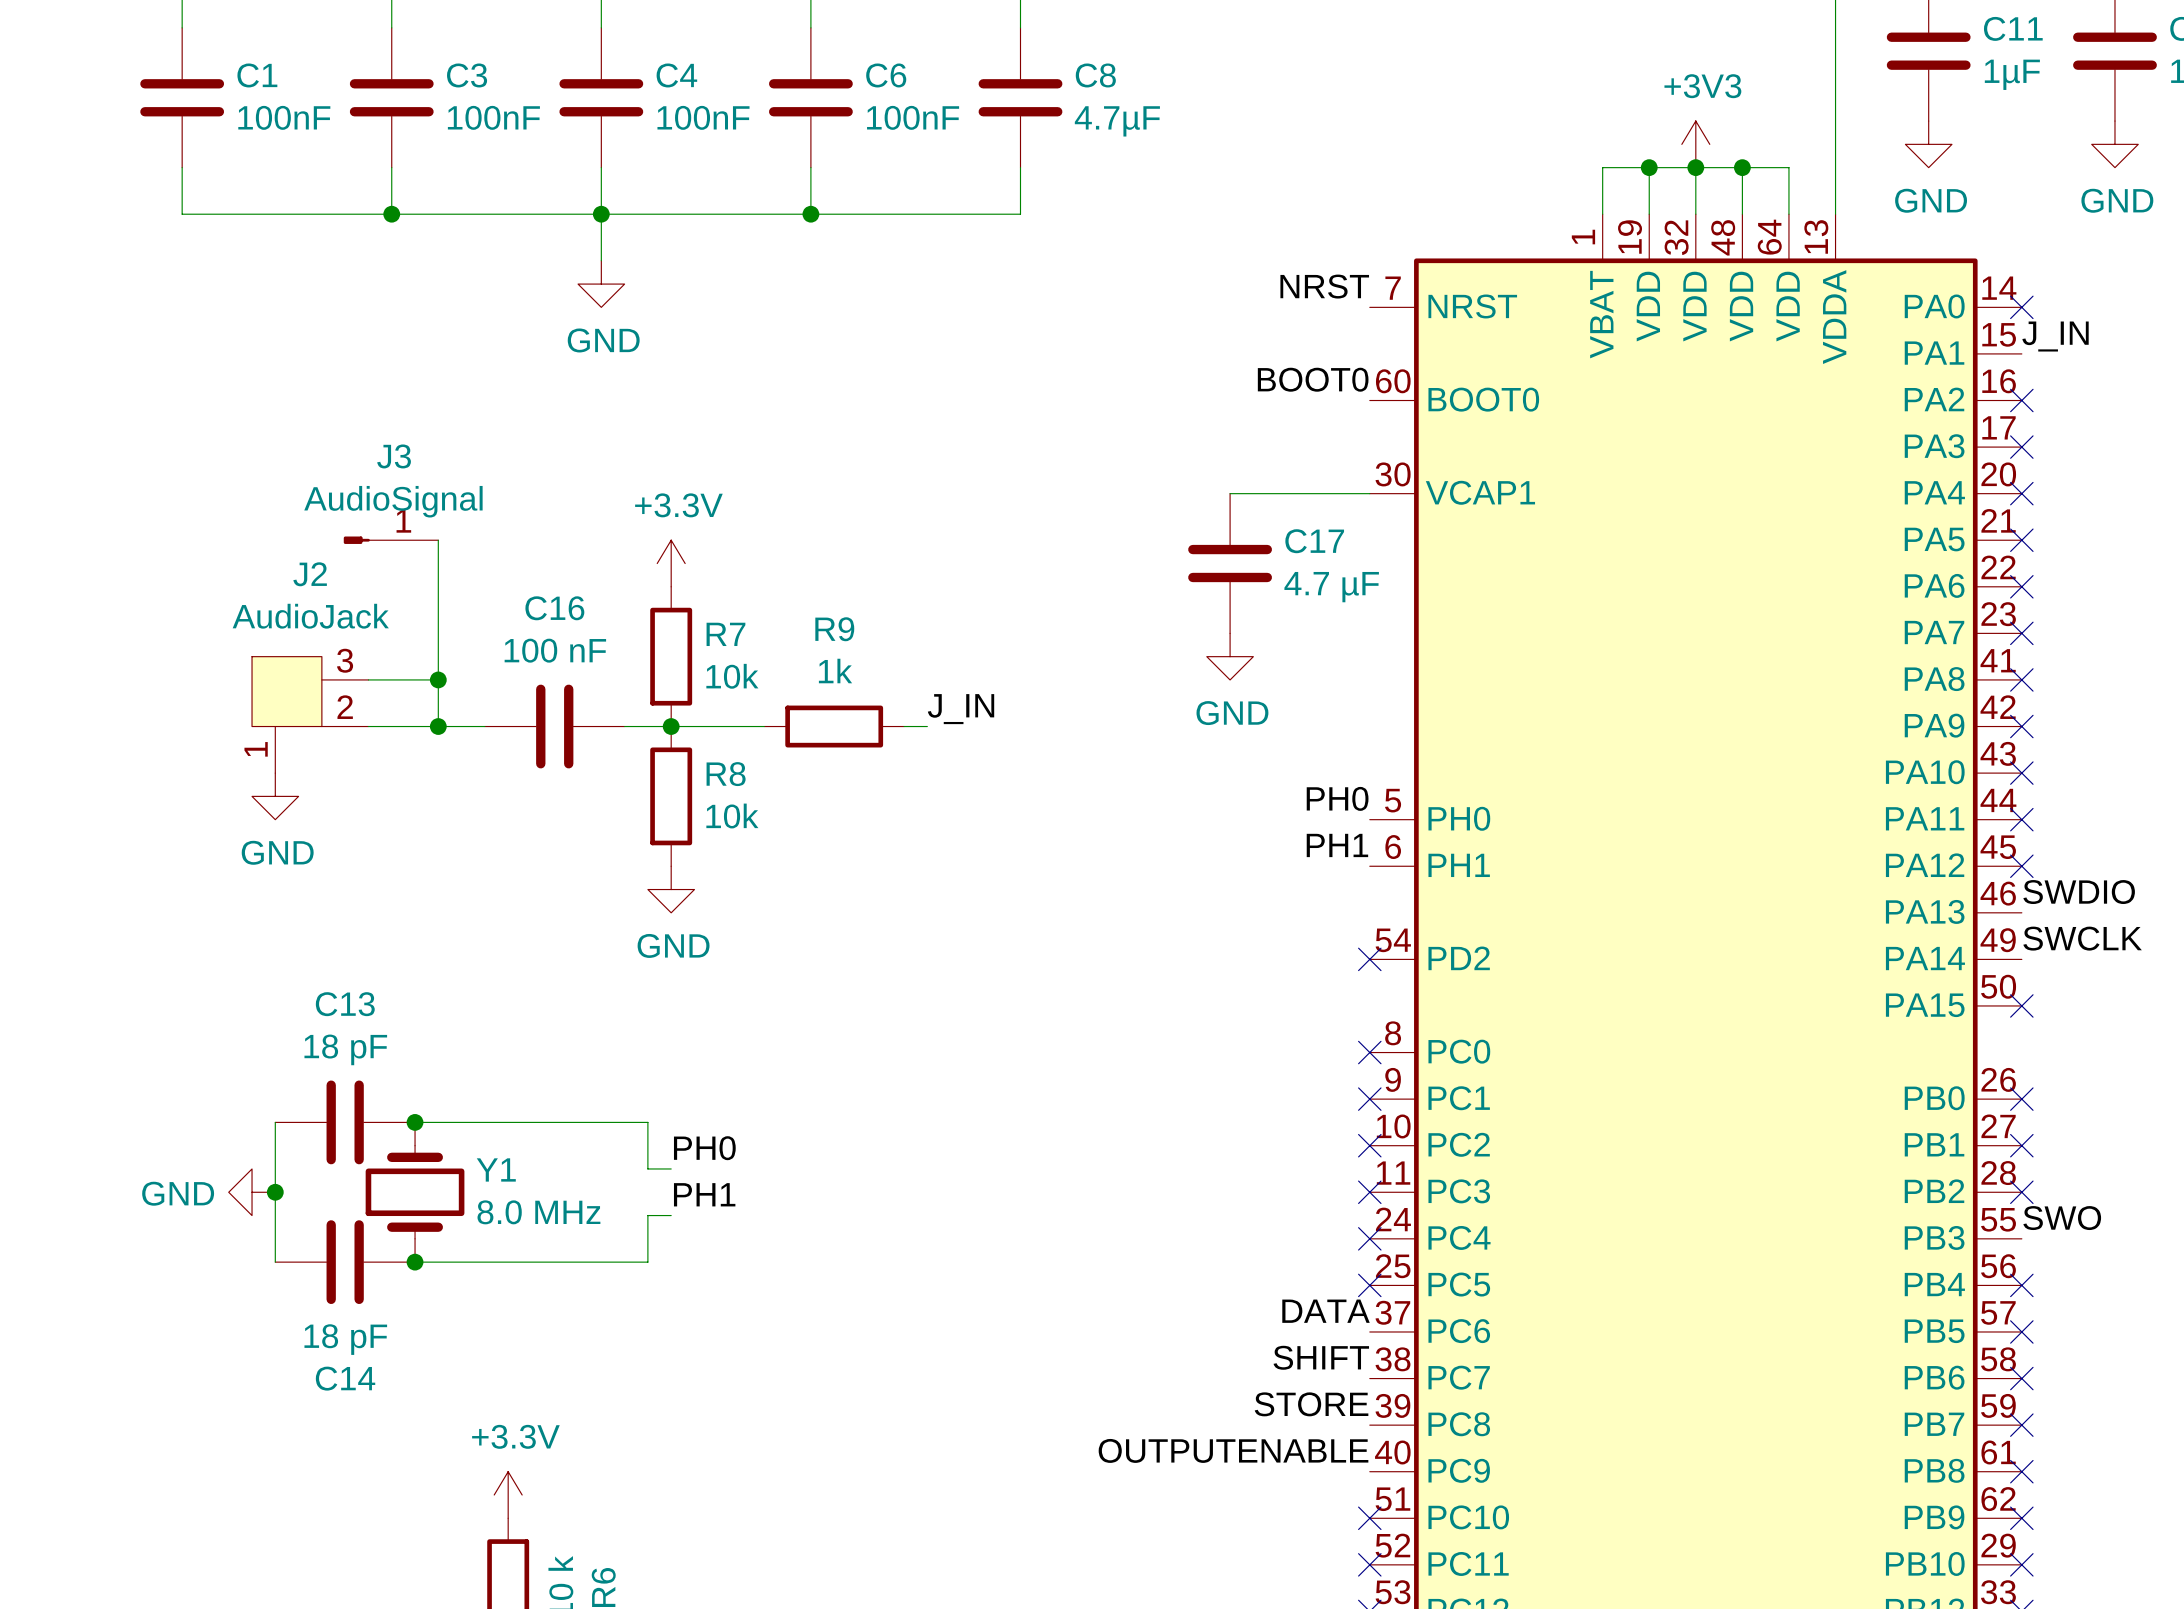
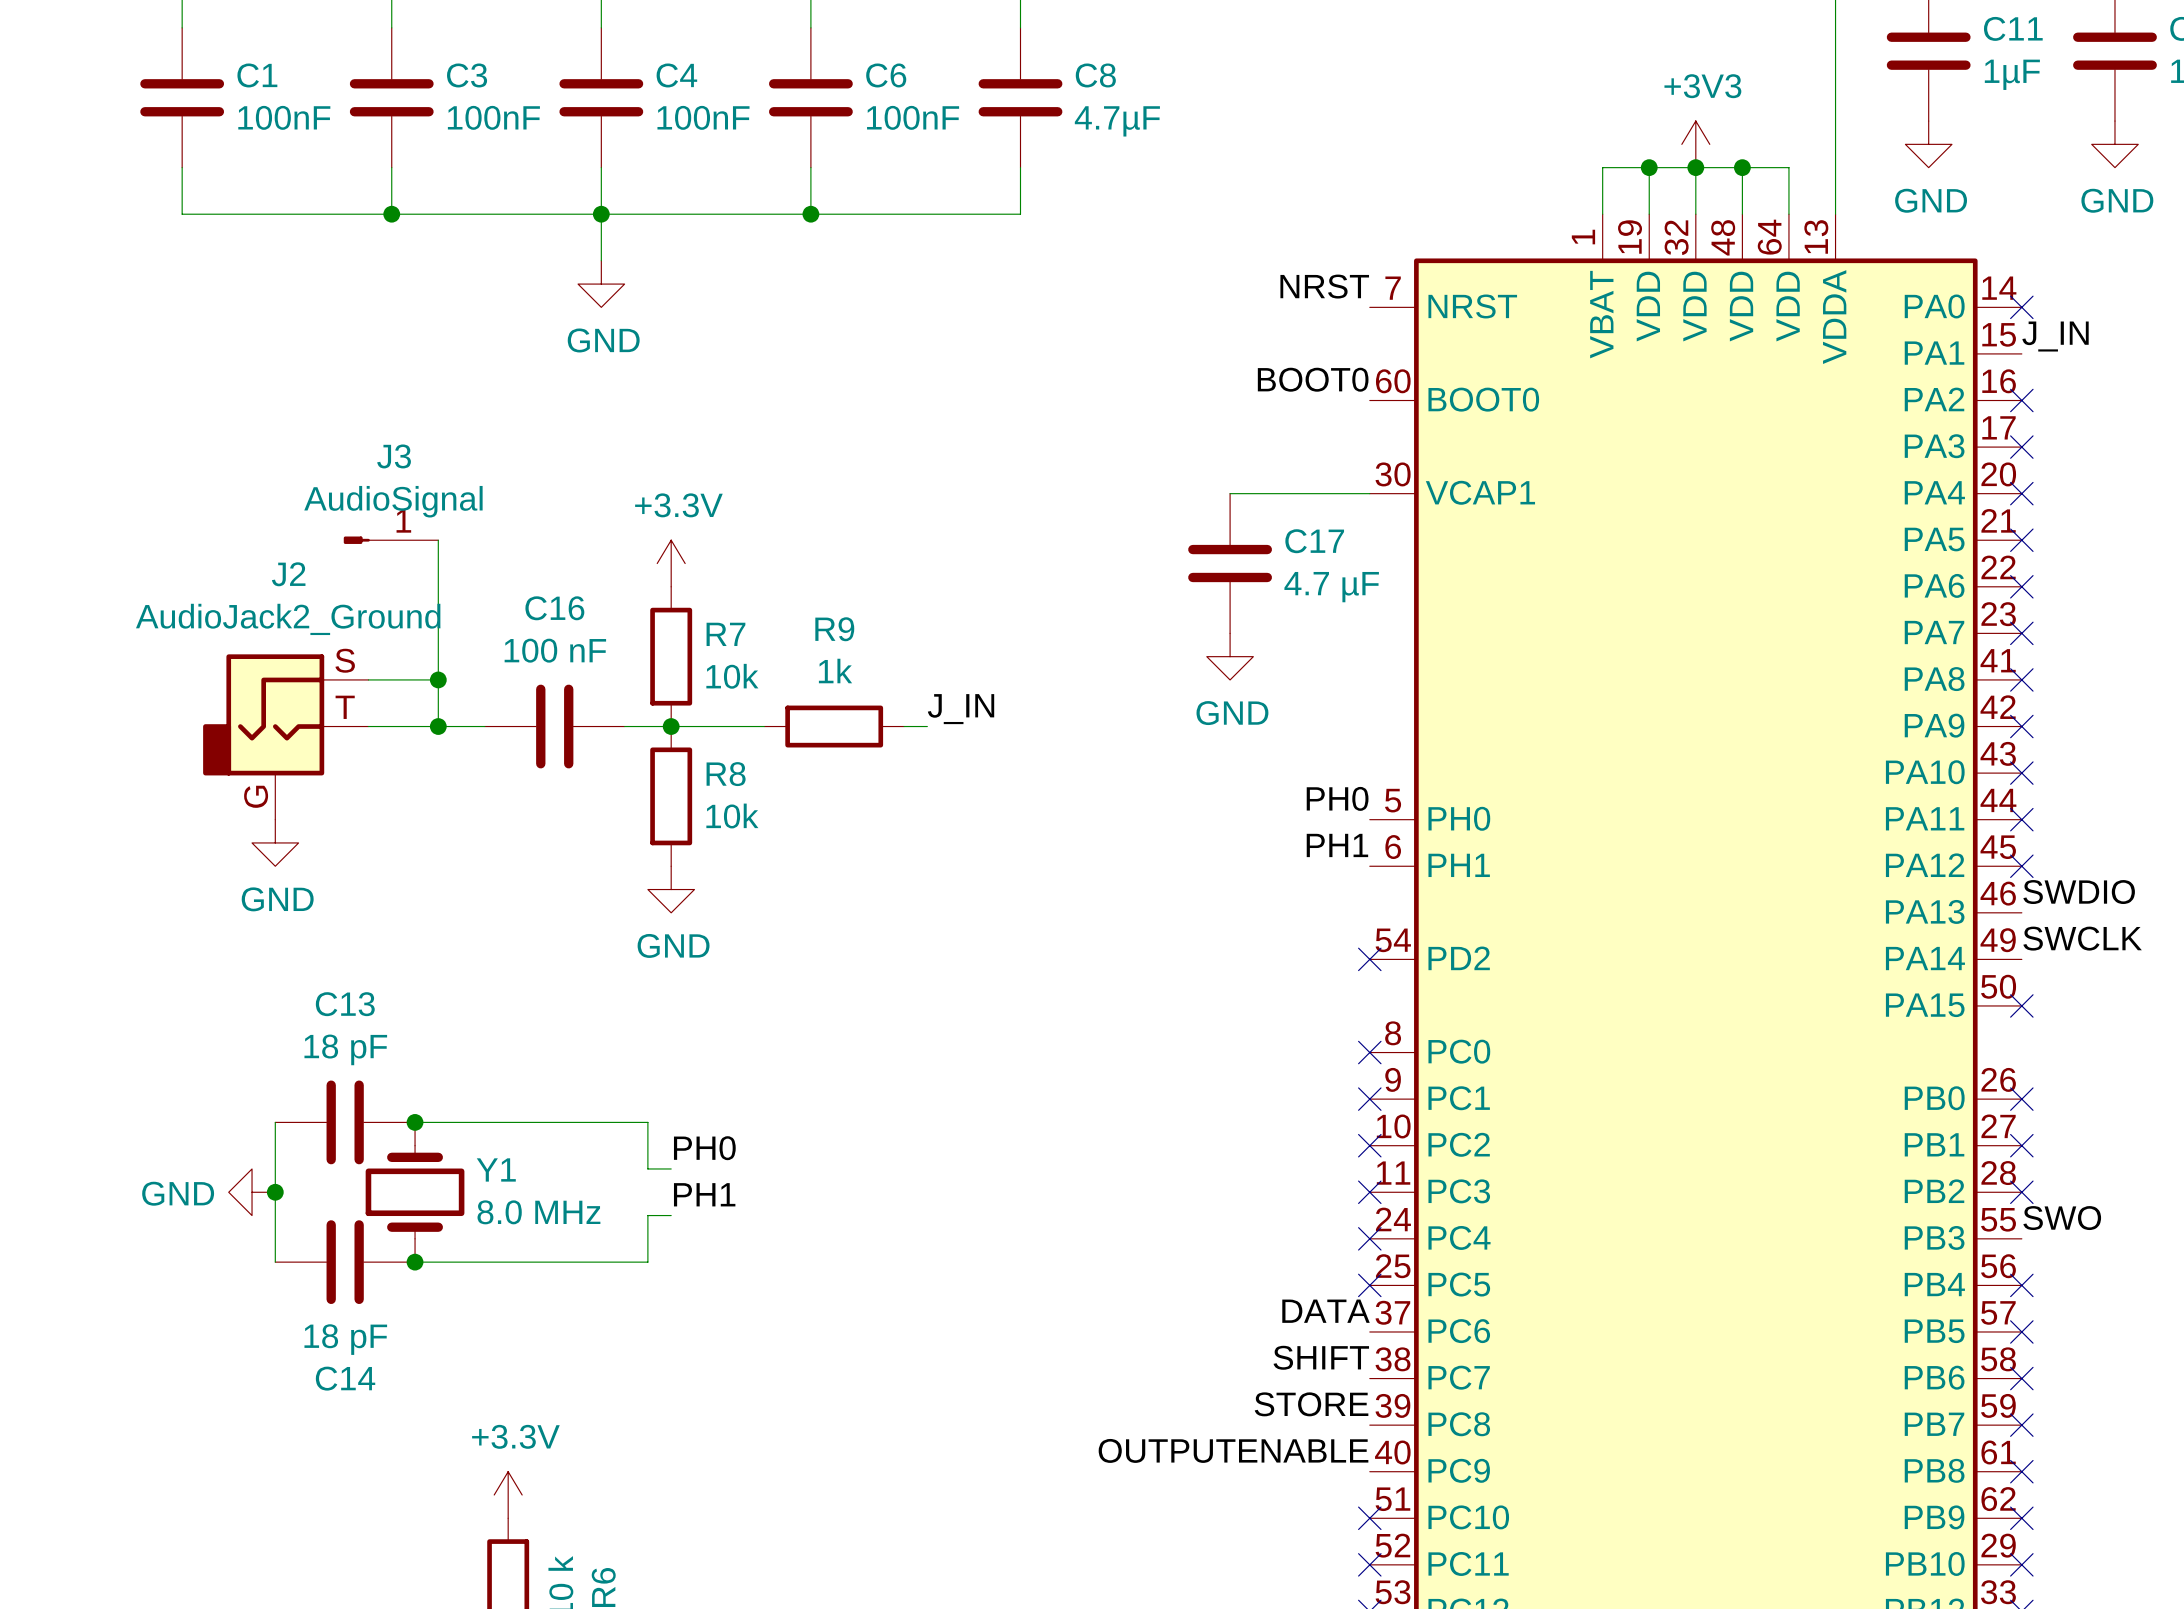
J2 value: AudioJack (310, 616) -> AudioJack2_Ground (288, 619)
J2 symbol: [252, 656, 369, 774] -> [203, 654, 369, 820]
power symbol position: GND (275, 796) -> GND (275, 842)

